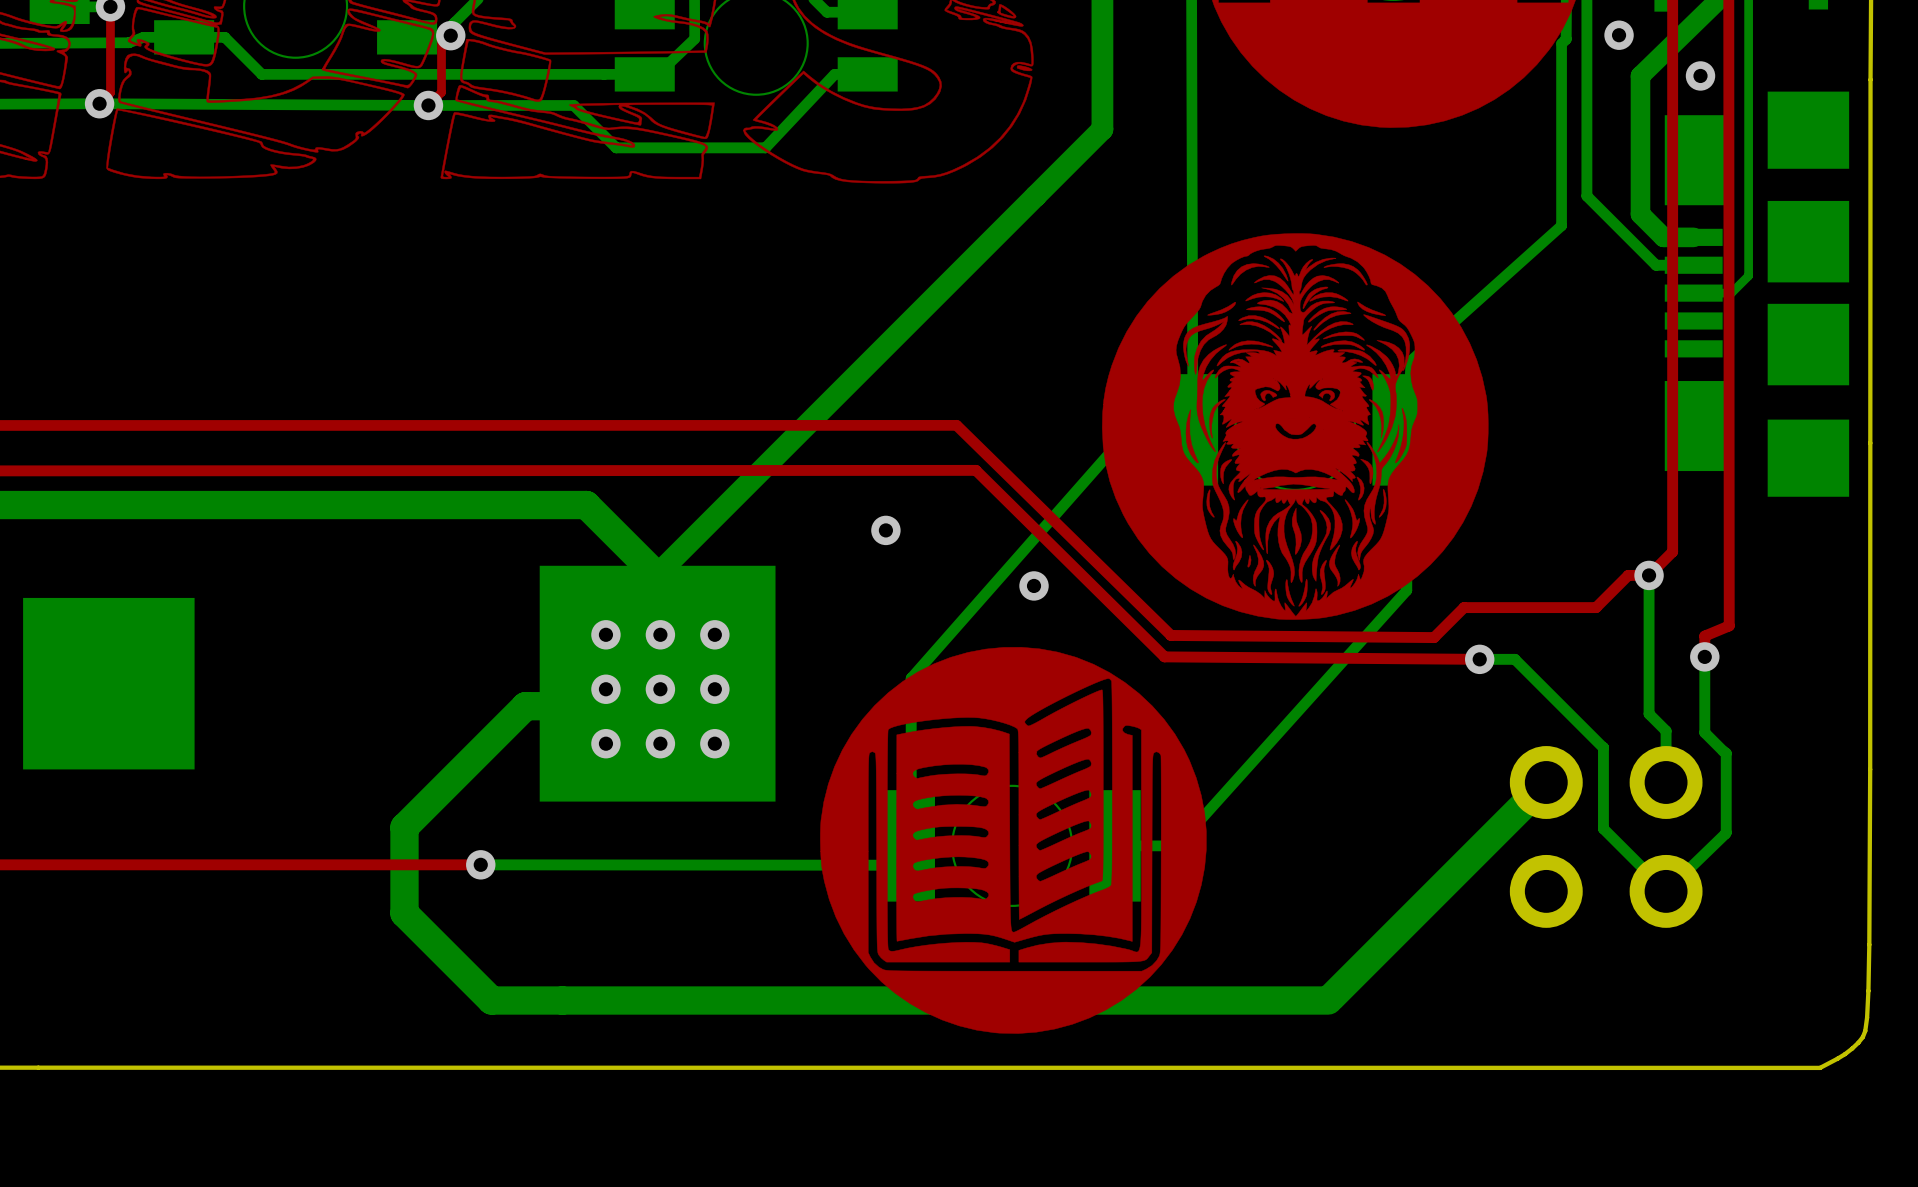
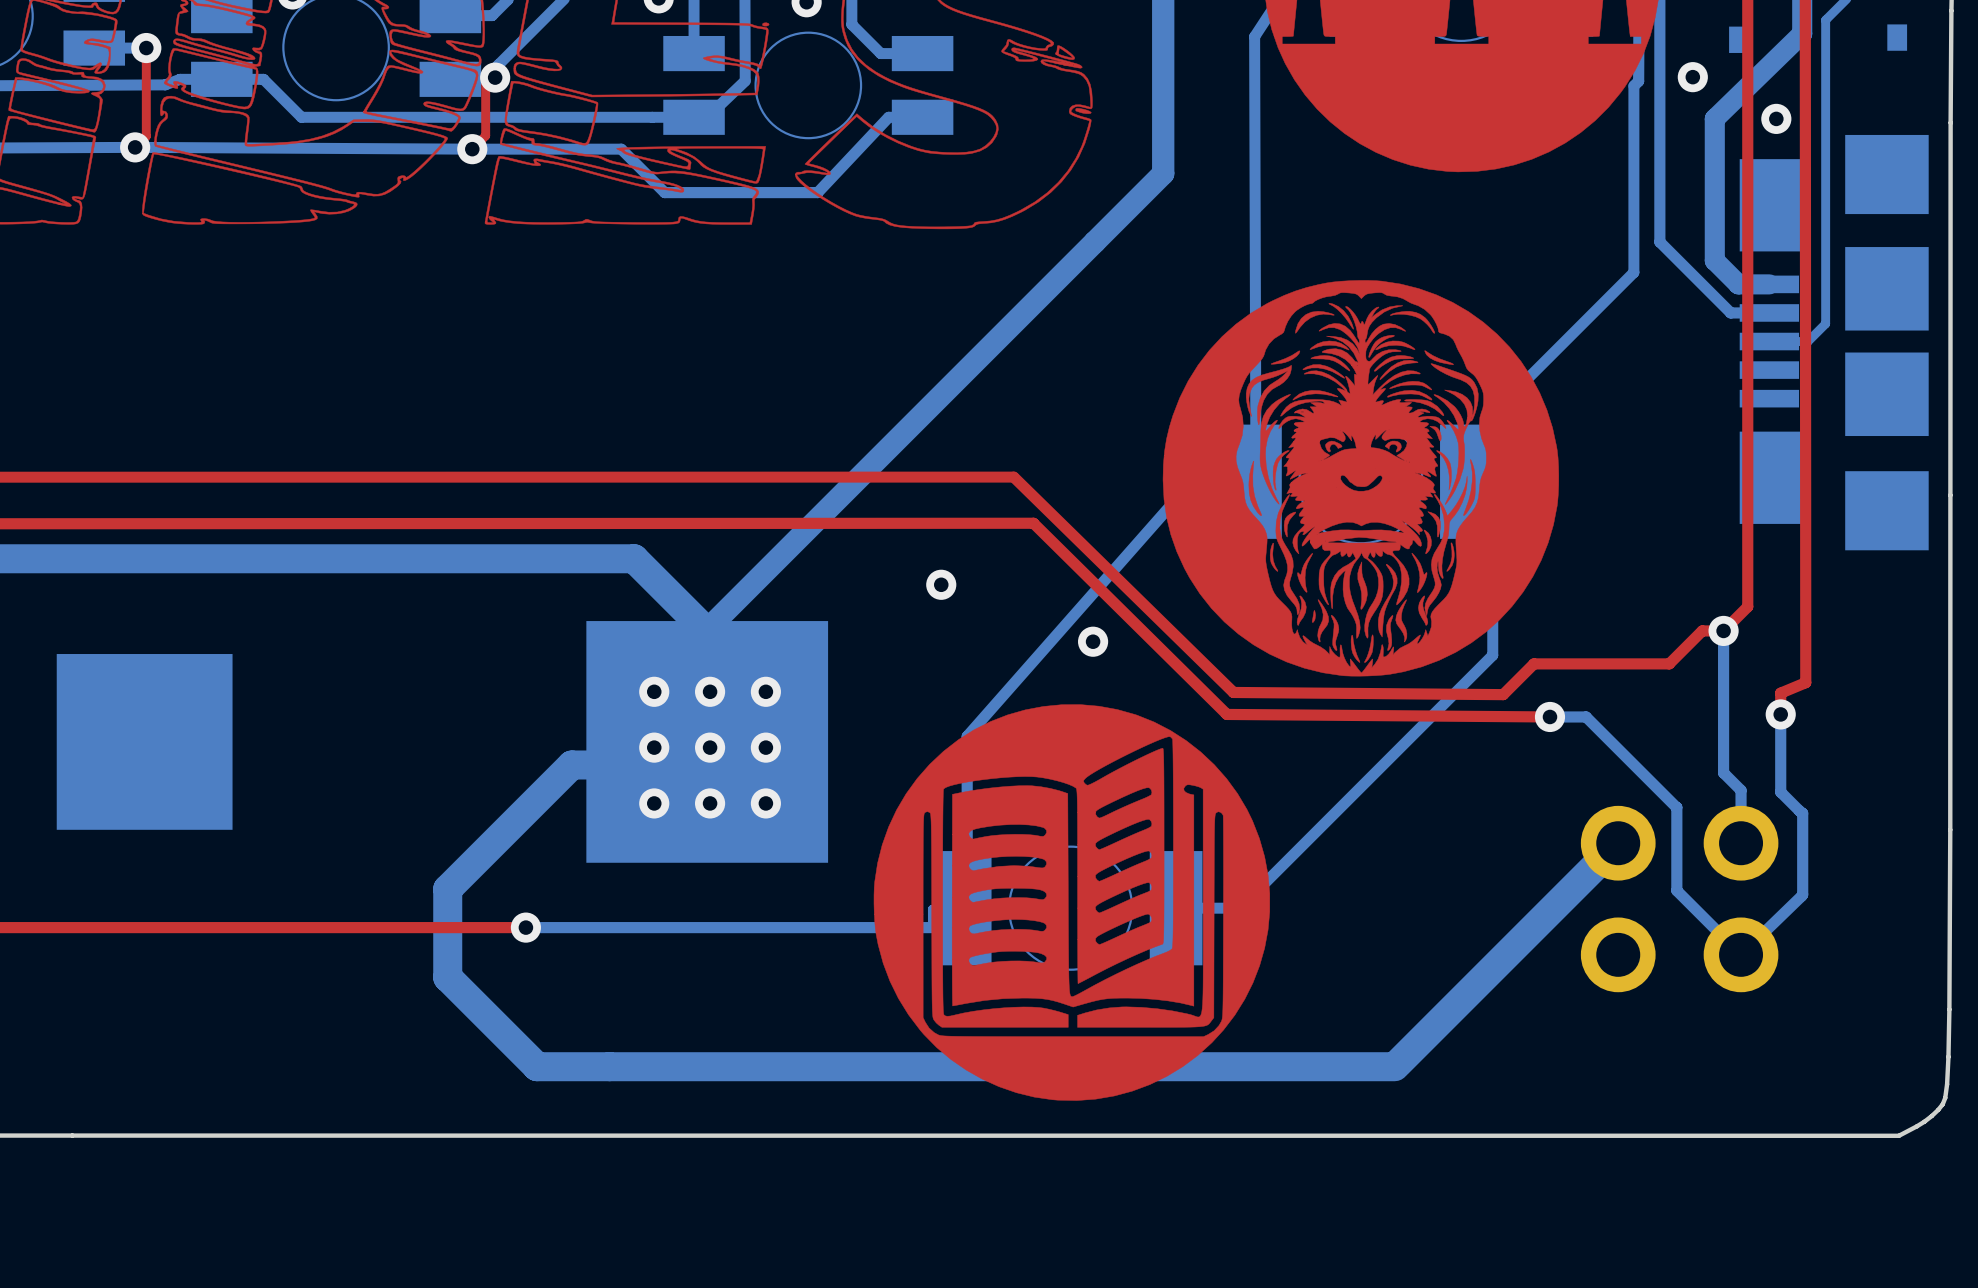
bottom track: (1561, 225) (1411, 360) (1407, 425) (1406, 590) (1177, 845) -> (1633, 272) (1492, 413) (1492, 655) (1239, 908)
bottom track: (480, 864) (909, 865) -> (525, 927) (931, 927) (932, 908) (965, 908)

